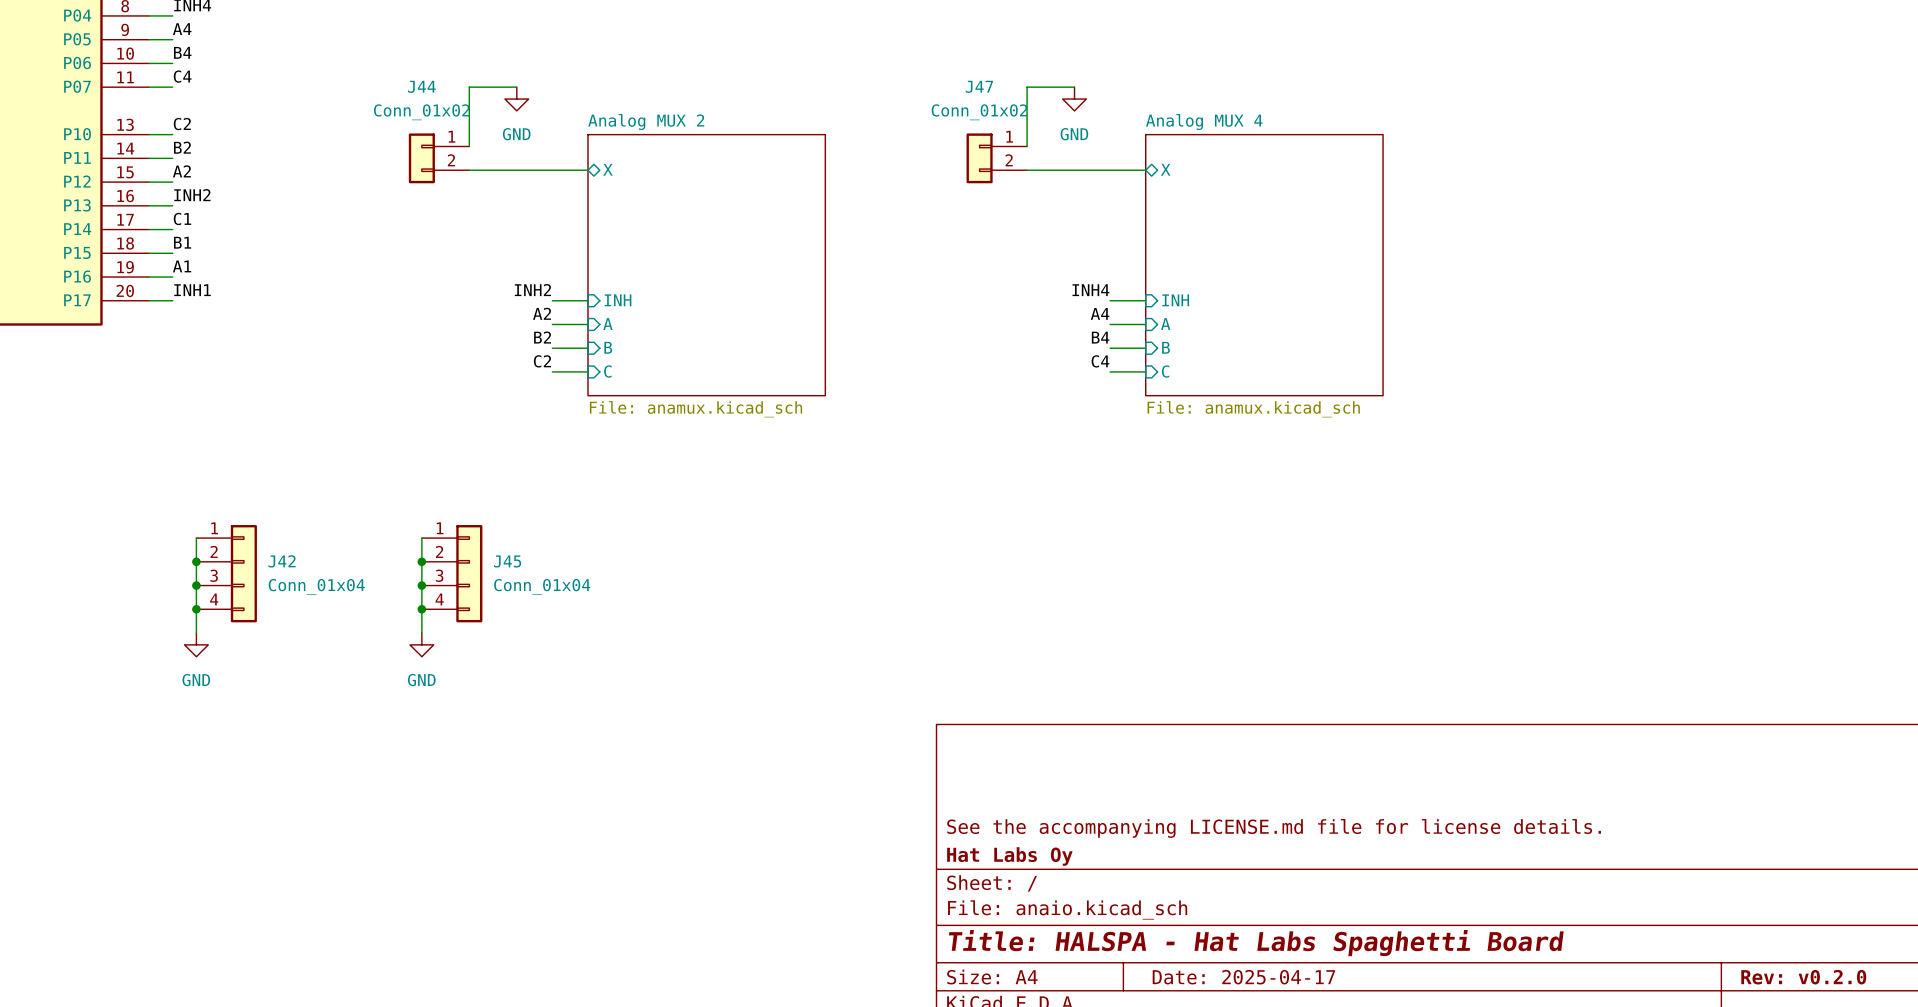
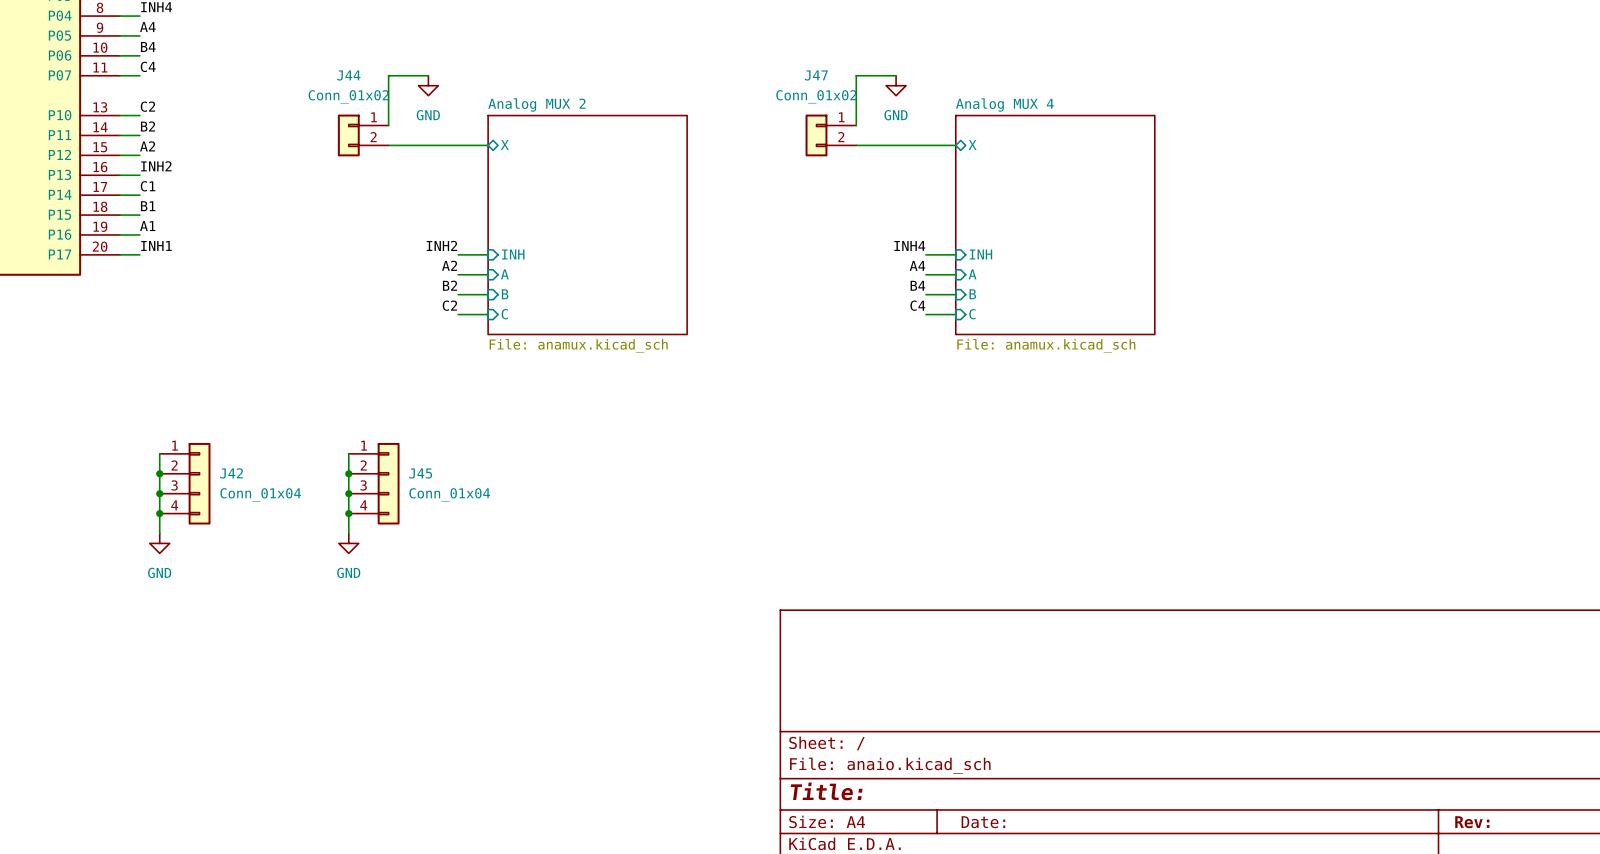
title block: See the accompanying LICENSE.md file for license details. (1274, 828) -> none
title block: Hat Labs Oy (1009, 856) -> none
title block: Title: HALSPA - Hat Labs Spaghetti Board (1256, 943) -> Title: (826, 791)
title block: Date: 2025-04-17 (1243, 977) -> Date: (983, 822)
title block: Rev: v0.2.0 (1803, 977) -> Rev: (1472, 822)

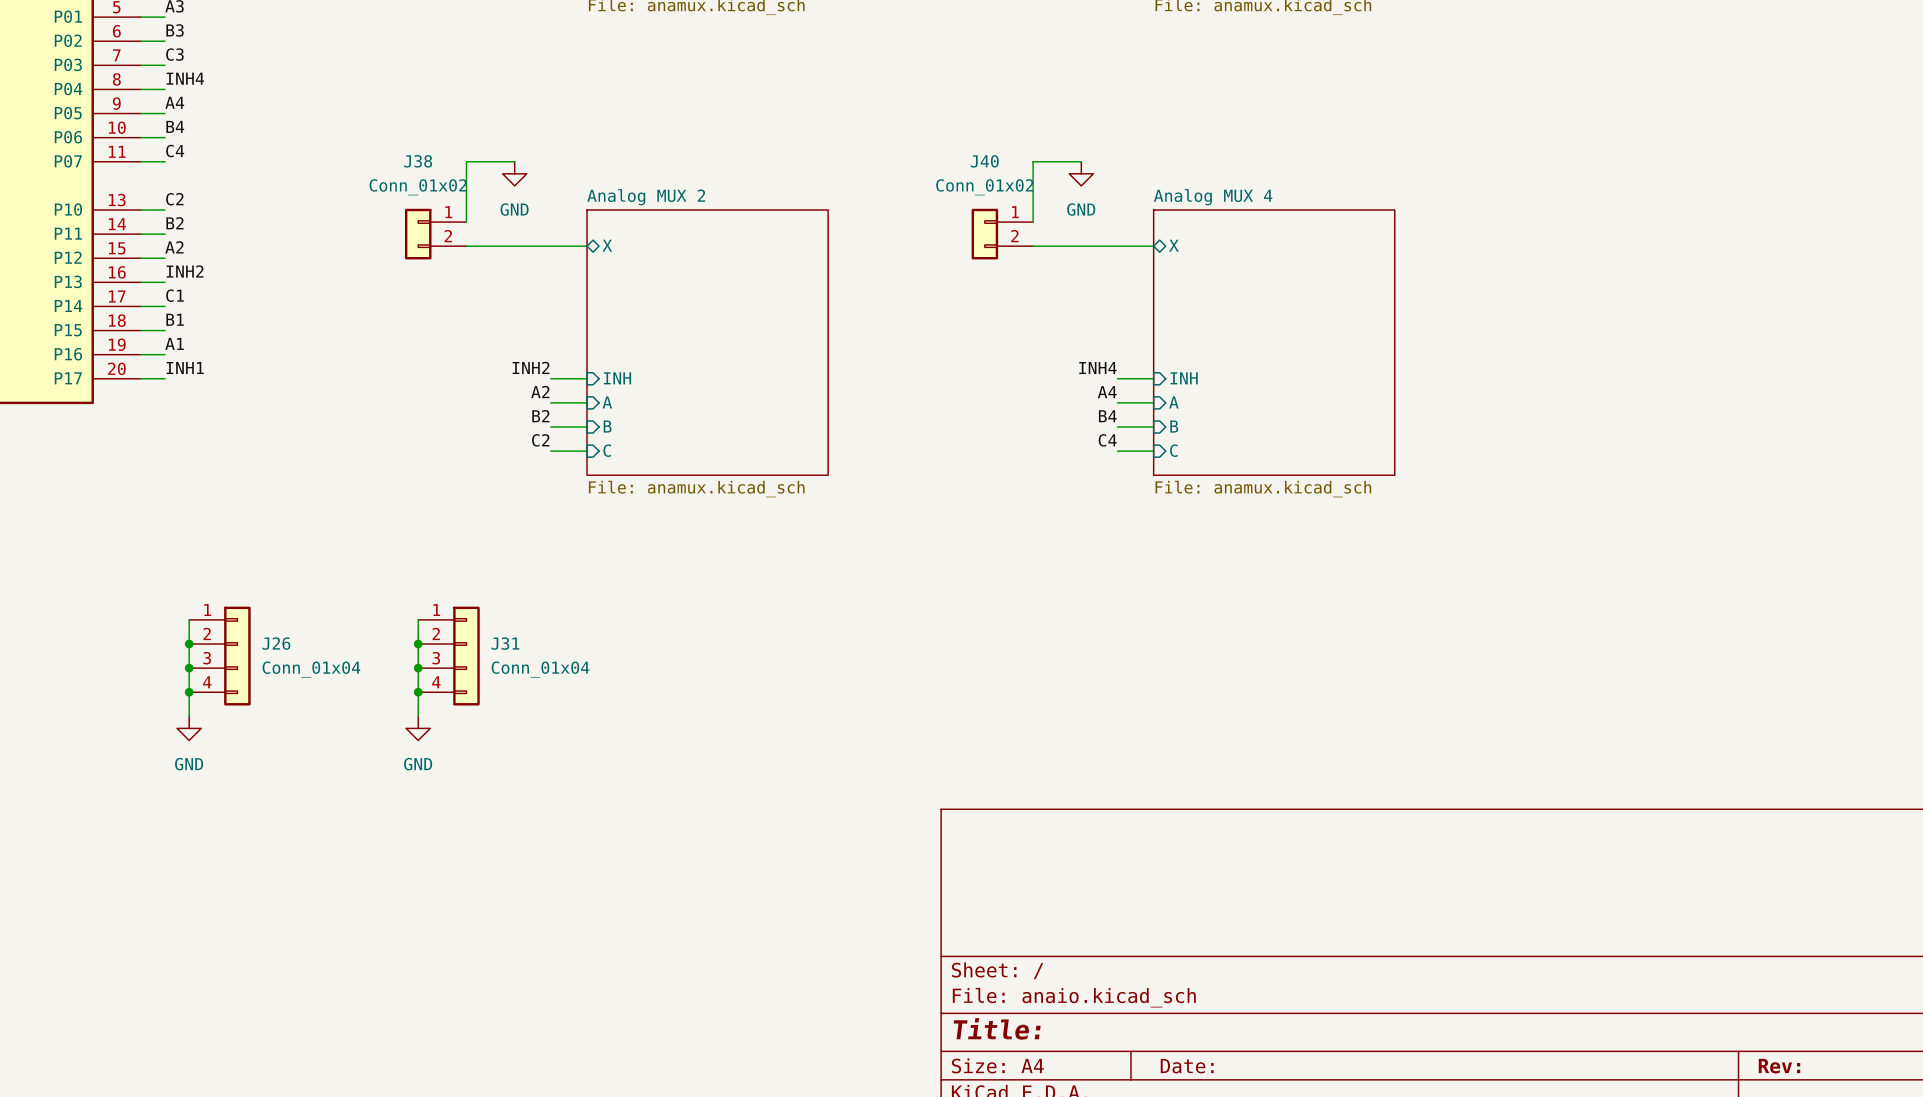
J44 name: J44 (348, 75) -> J38 (418, 161)
J47 name: J47 (816, 75) -> J40 (984, 161)
J42 name: J42 (231, 473) -> J26 (276, 643)
J45 name: J45 (420, 473) -> J31 (505, 643)

